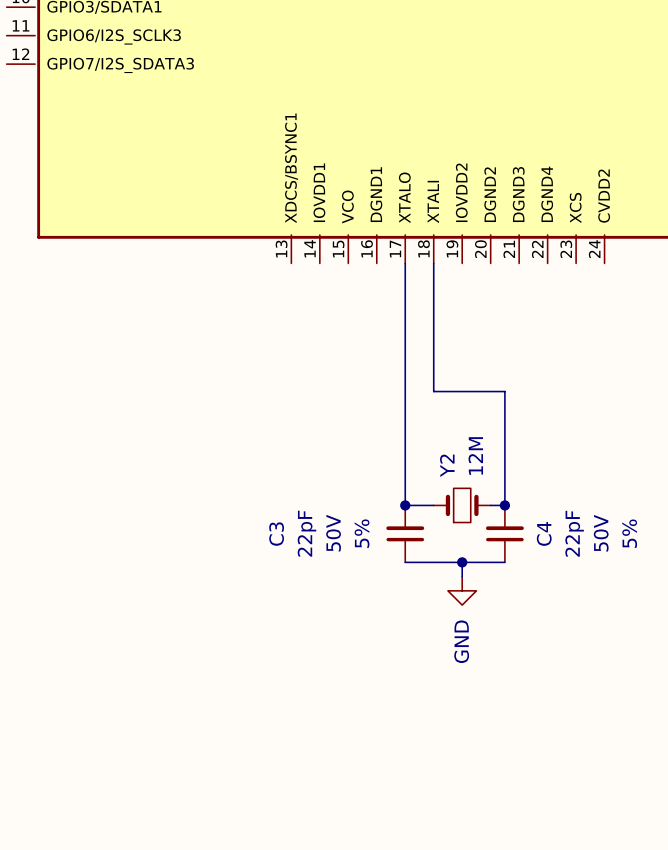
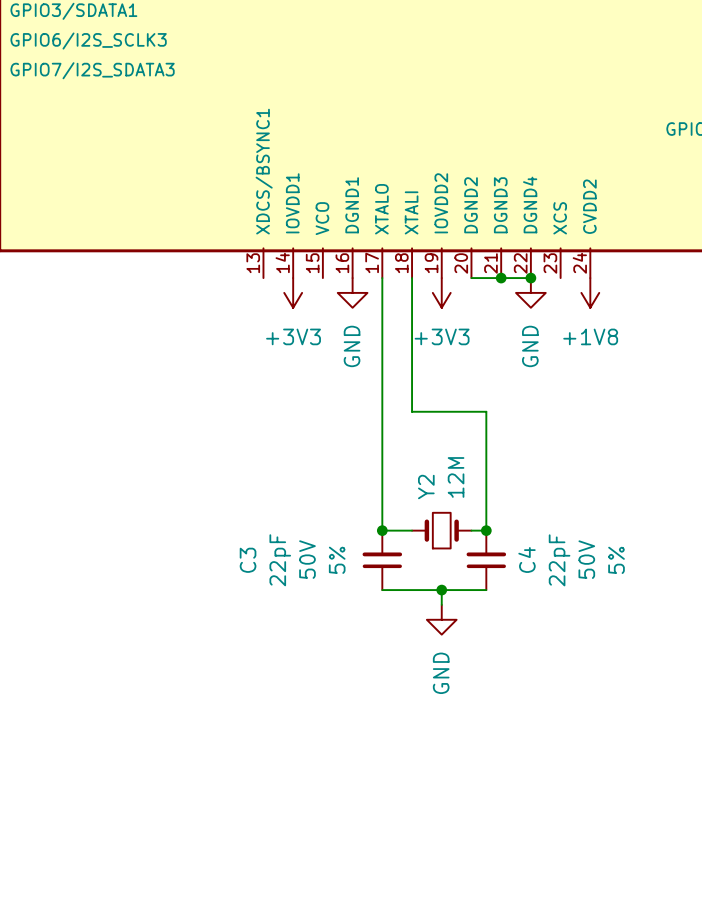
wire: none -> (471, 278) (530, 278)
junction: none -> (501, 278)
junction: none -> (530, 278)
power symbol: none -> +3V3 (293, 292)
power symbol: none -> GND (352, 292)
power symbol: none -> +3V3 (441, 292)
power symbol: none -> GND (530, 292)
power symbol: none -> +1V8 (590, 292)

